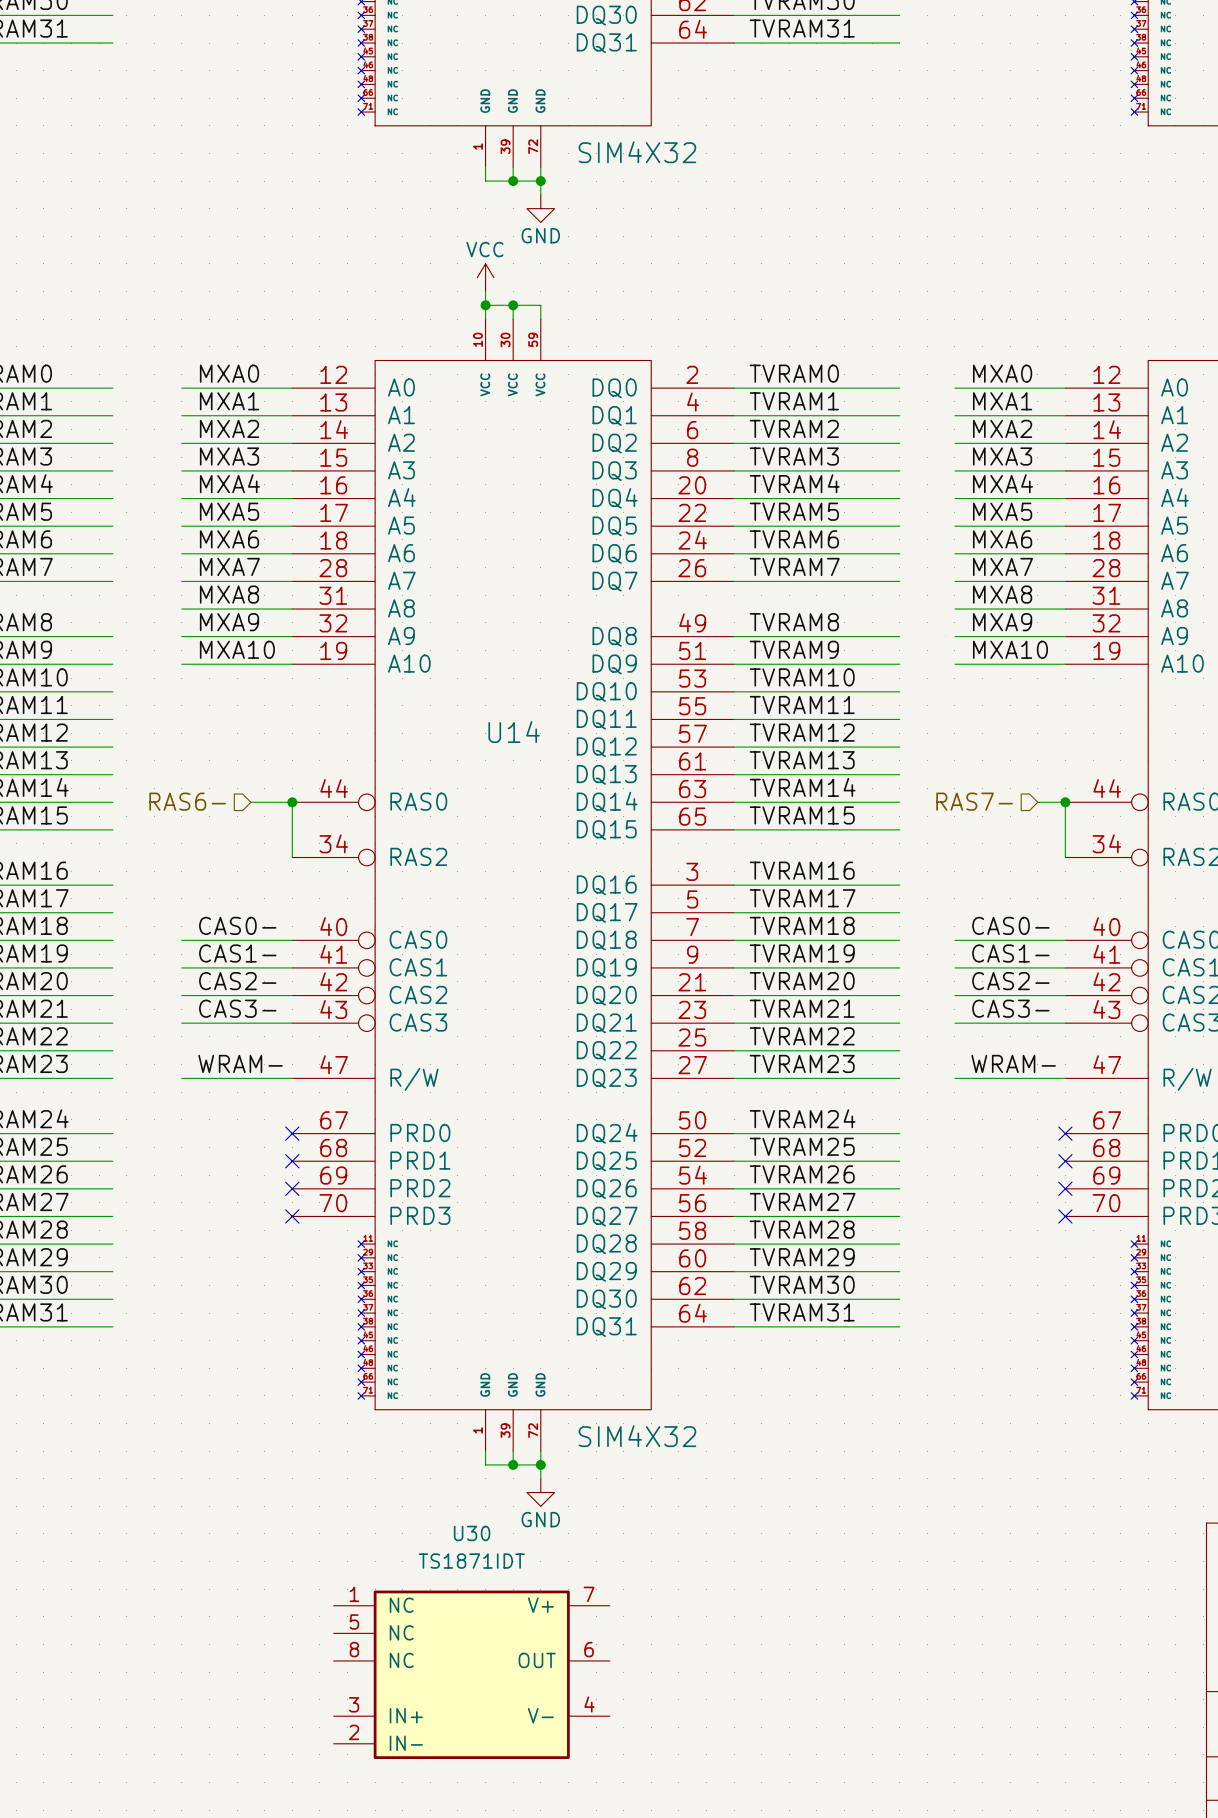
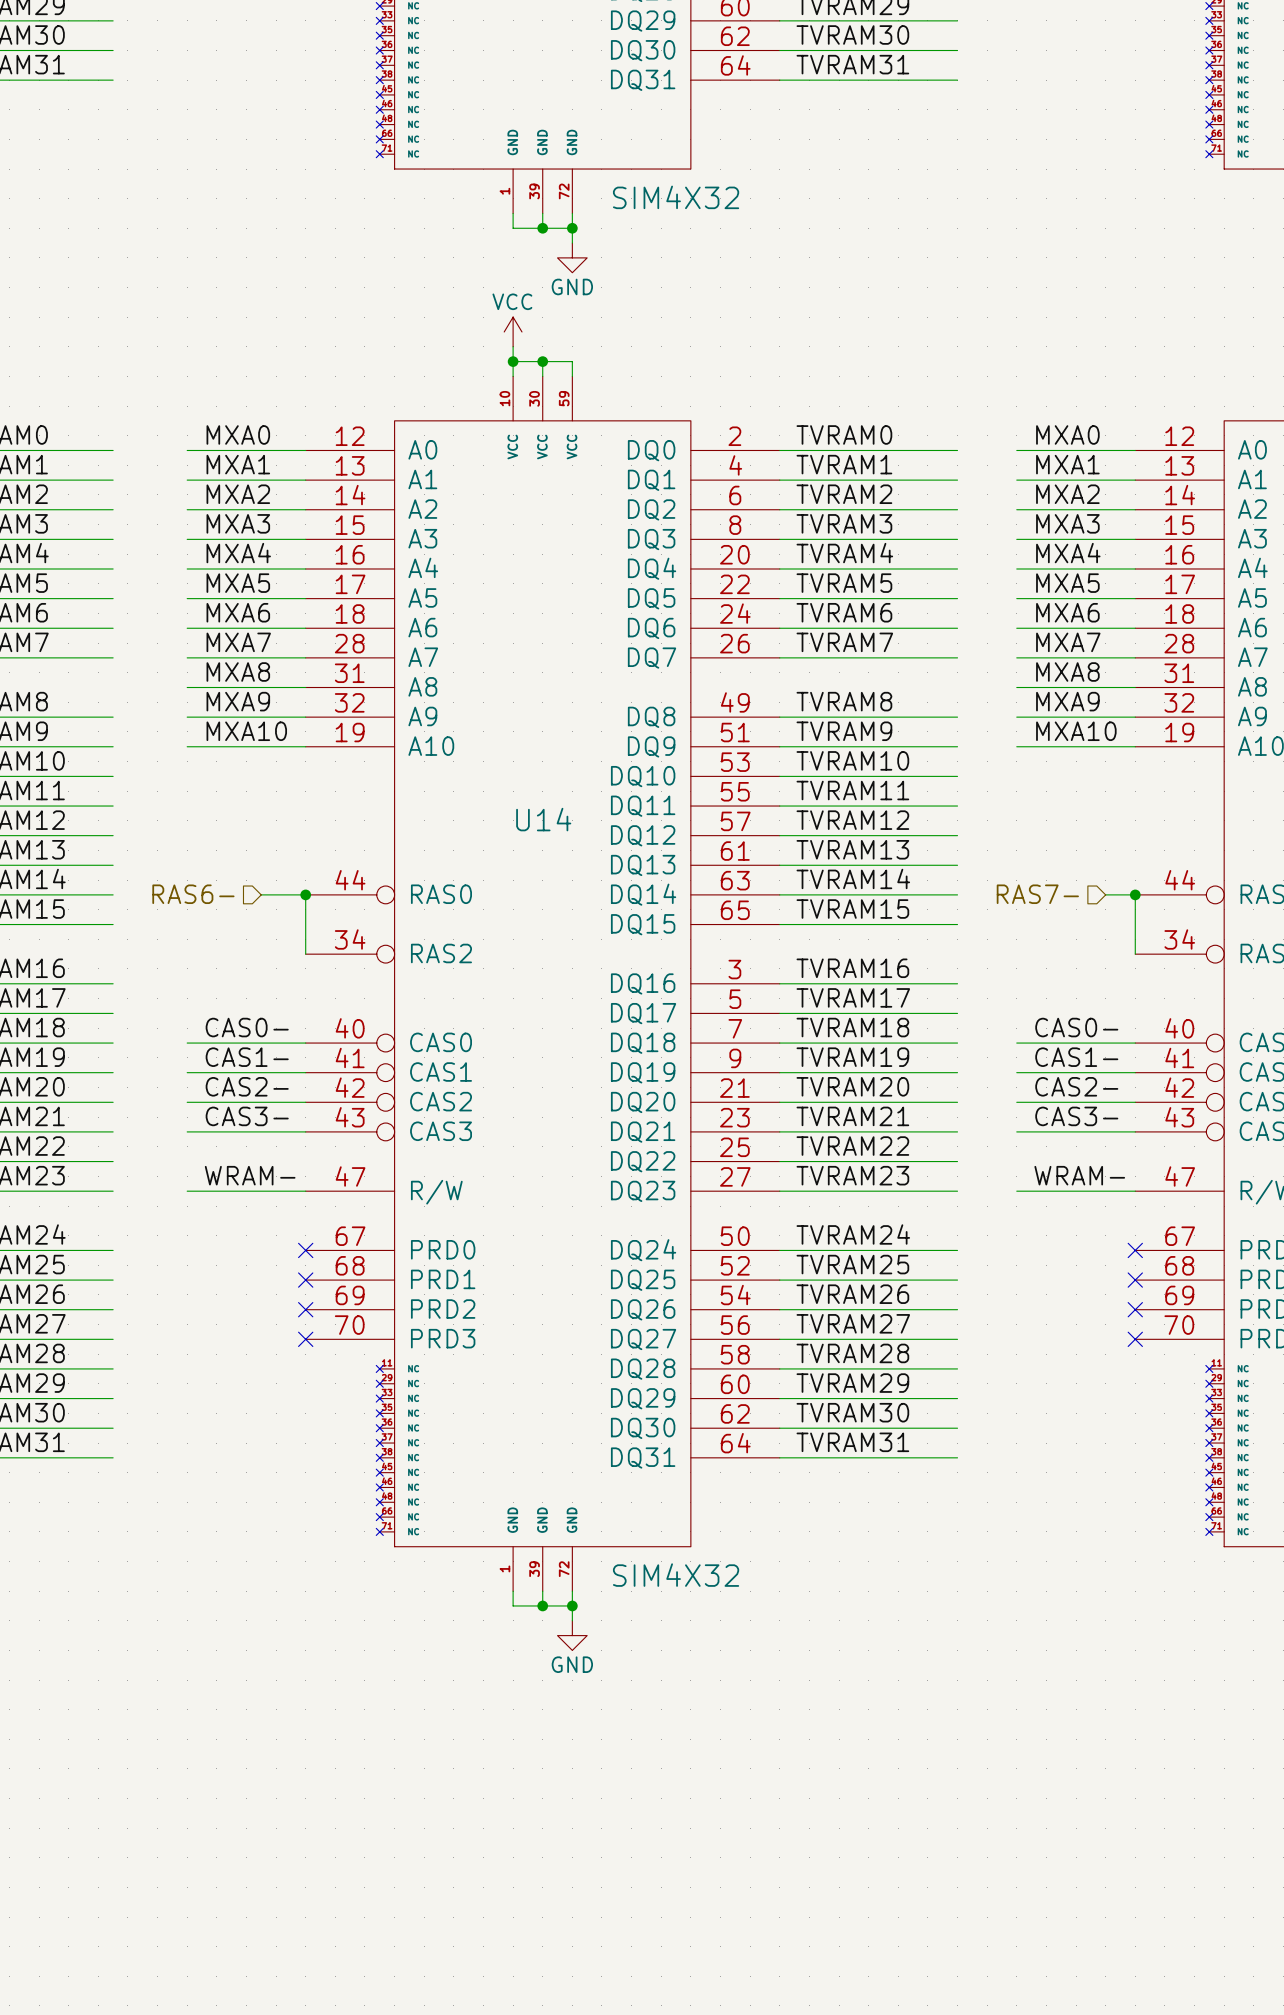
U30: TS1871IDT (471, 1674) -> none

